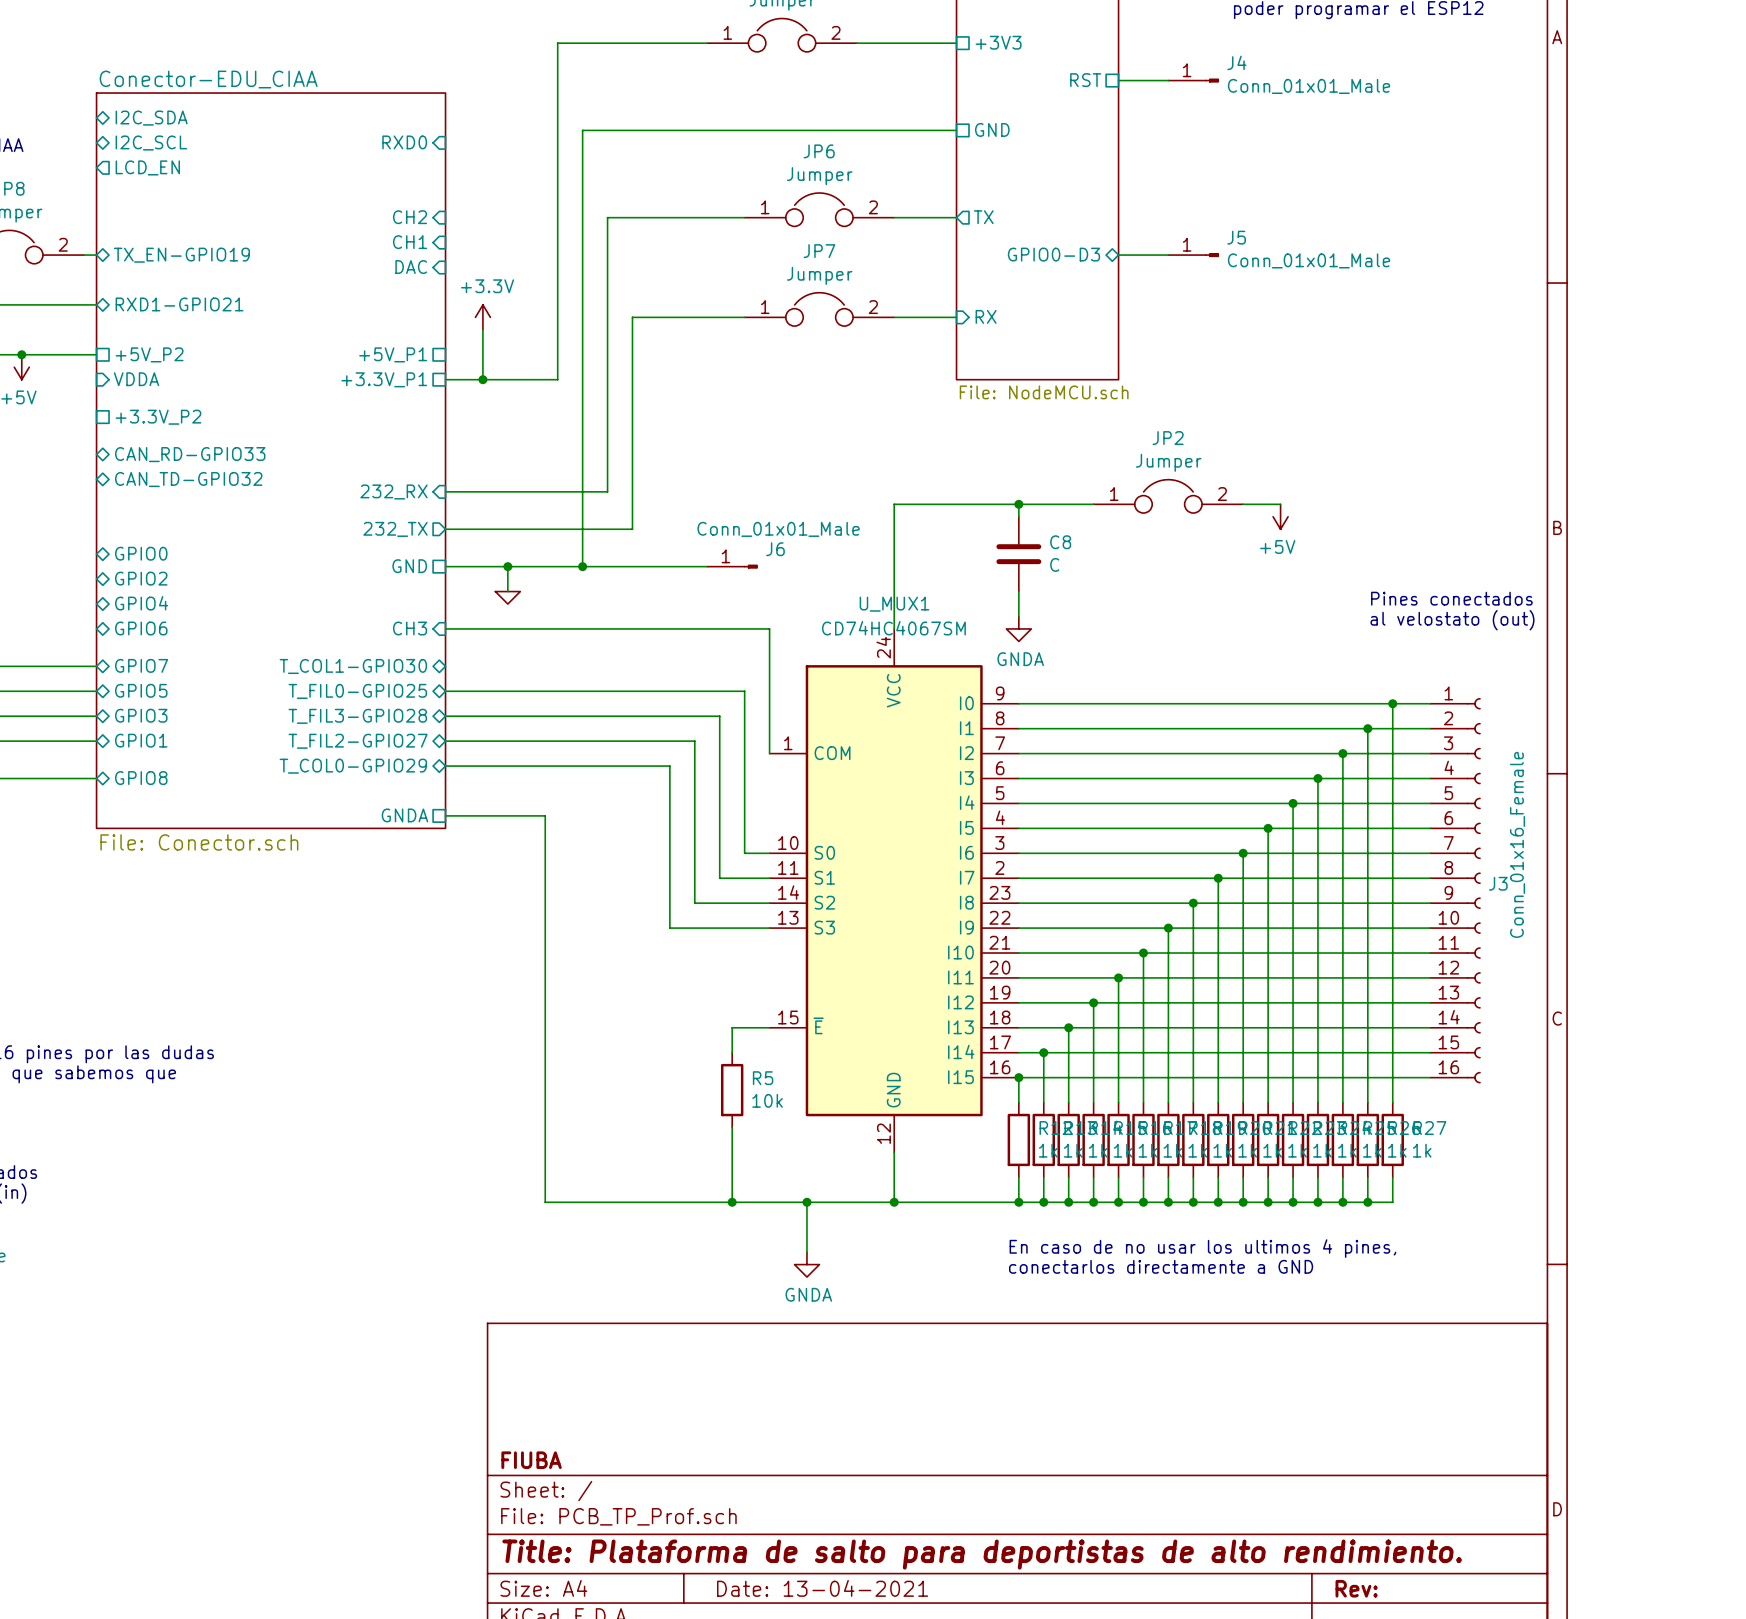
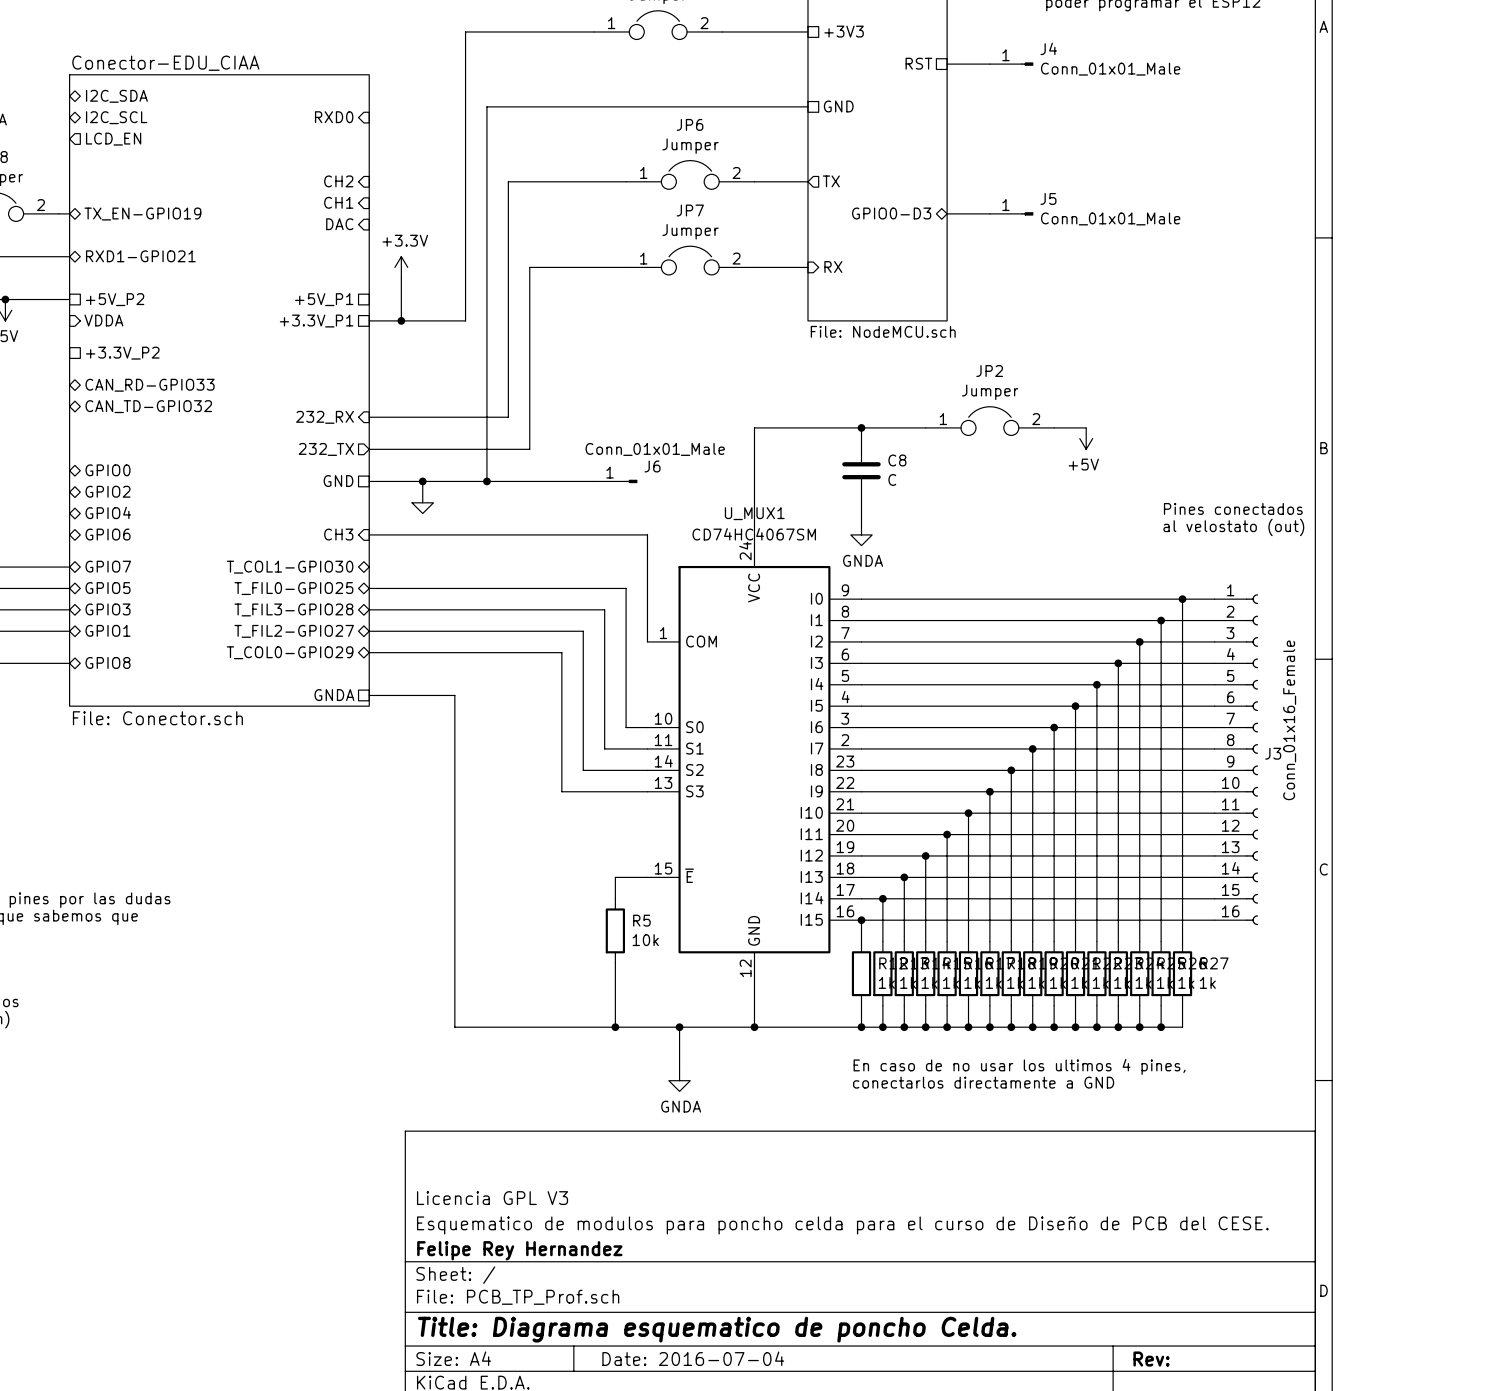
title block: none -> Licencia GPL V3 (492, 1198)
title block: none -> Esquematico de modulos para poncho celda para el curso de Diseño de PCB del CESE. (842, 1225)
title block: FIUBA (531, 1460) -> Felipe Rey Hernandez (519, 1250)
title block: Title: Plataforma de salto para deportistas de alto rendimiento. (982, 1554) -> Title: Diagrama esquematico de poncho Celda. (717, 1329)
title block: Date: 13-04-2021 (822, 1588) -> Date: 2016-07-04 (693, 1358)

